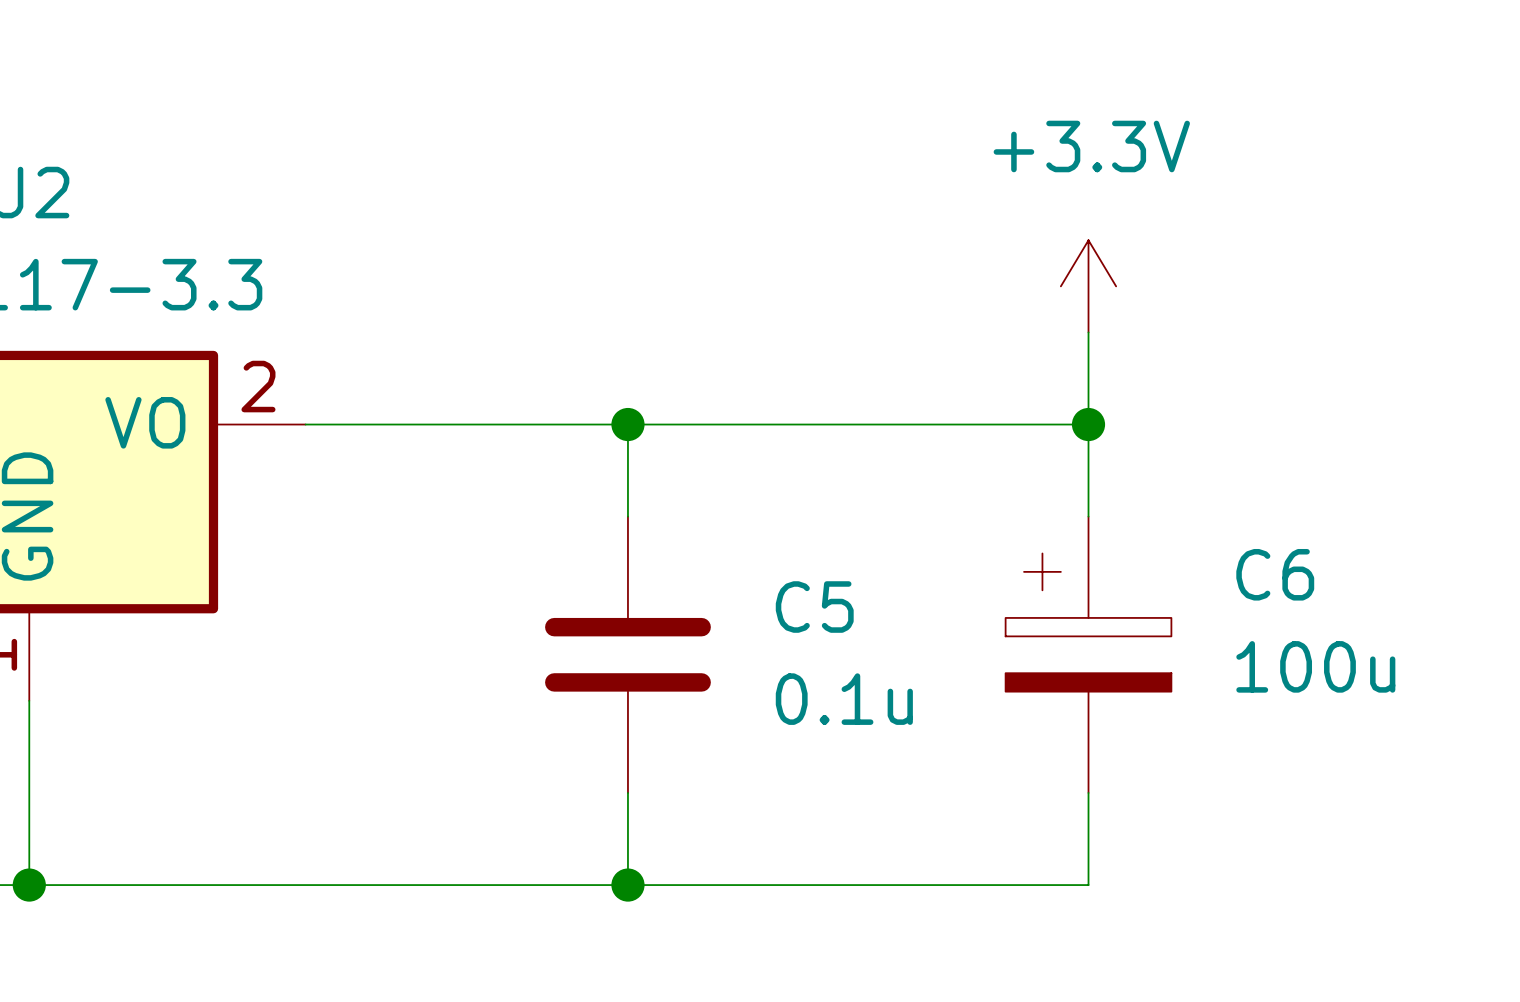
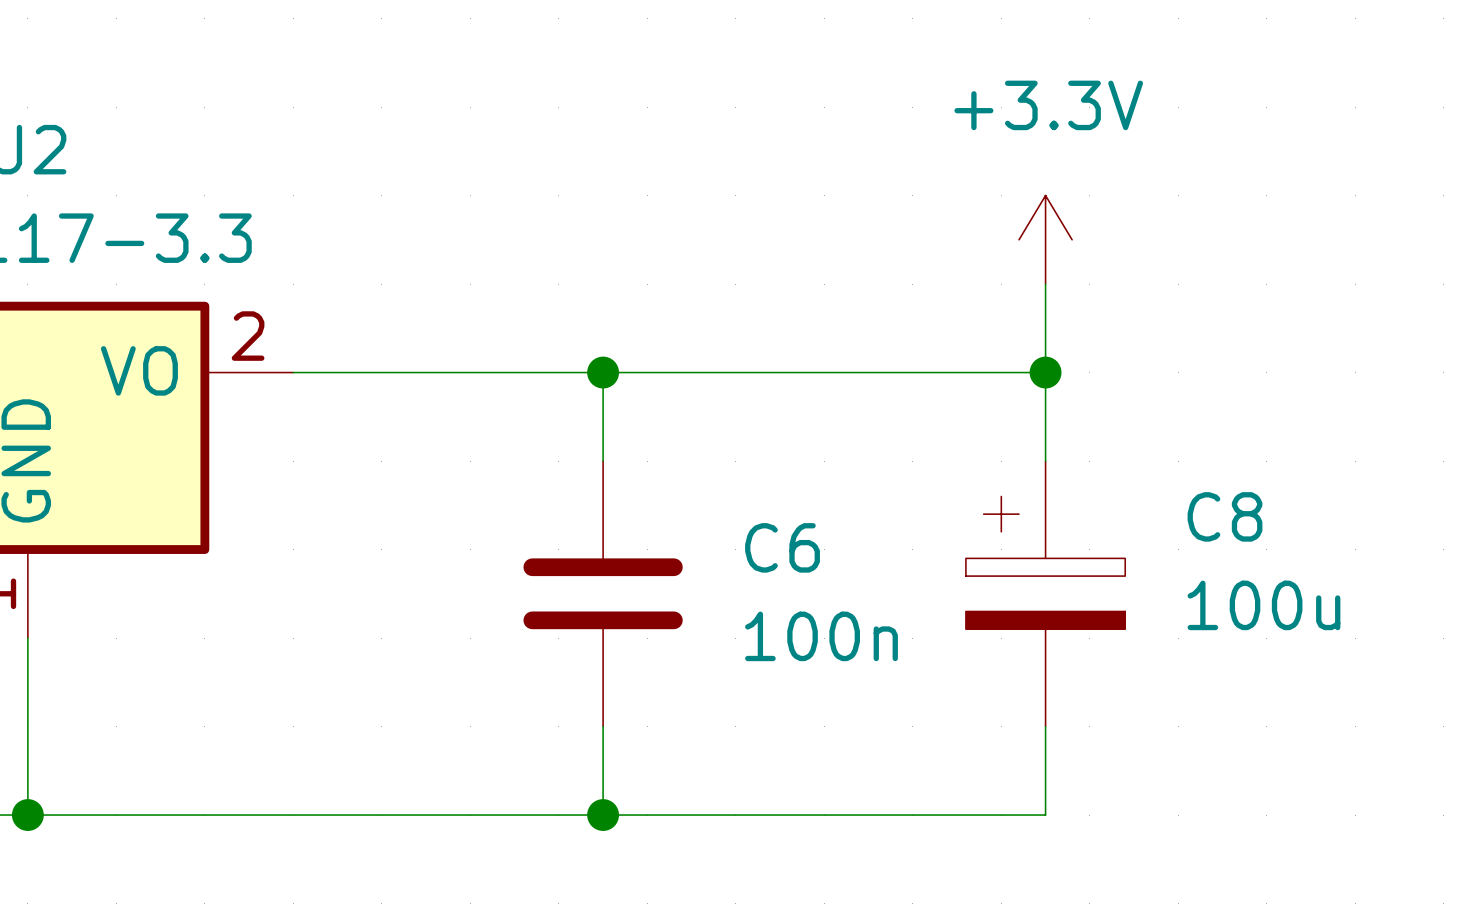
C6 name: C6 (1275, 574) -> C8 (1224, 516)
C5 name: C5 (814, 607) -> C6 (782, 547)
C5 value: 0.1u (844, 699) -> 100n (821, 636)

